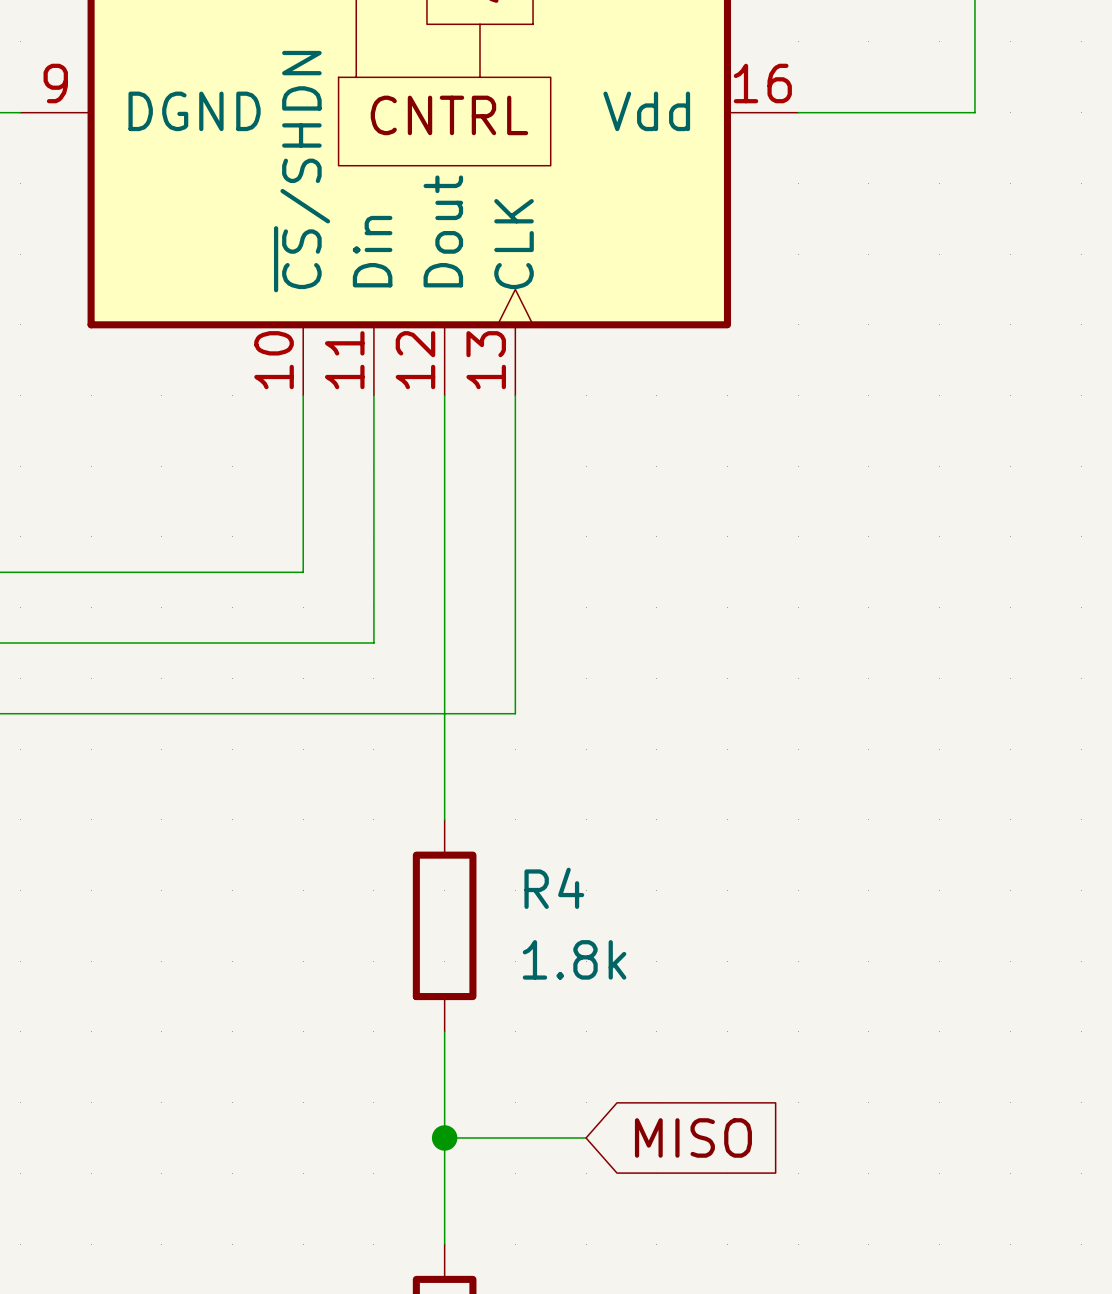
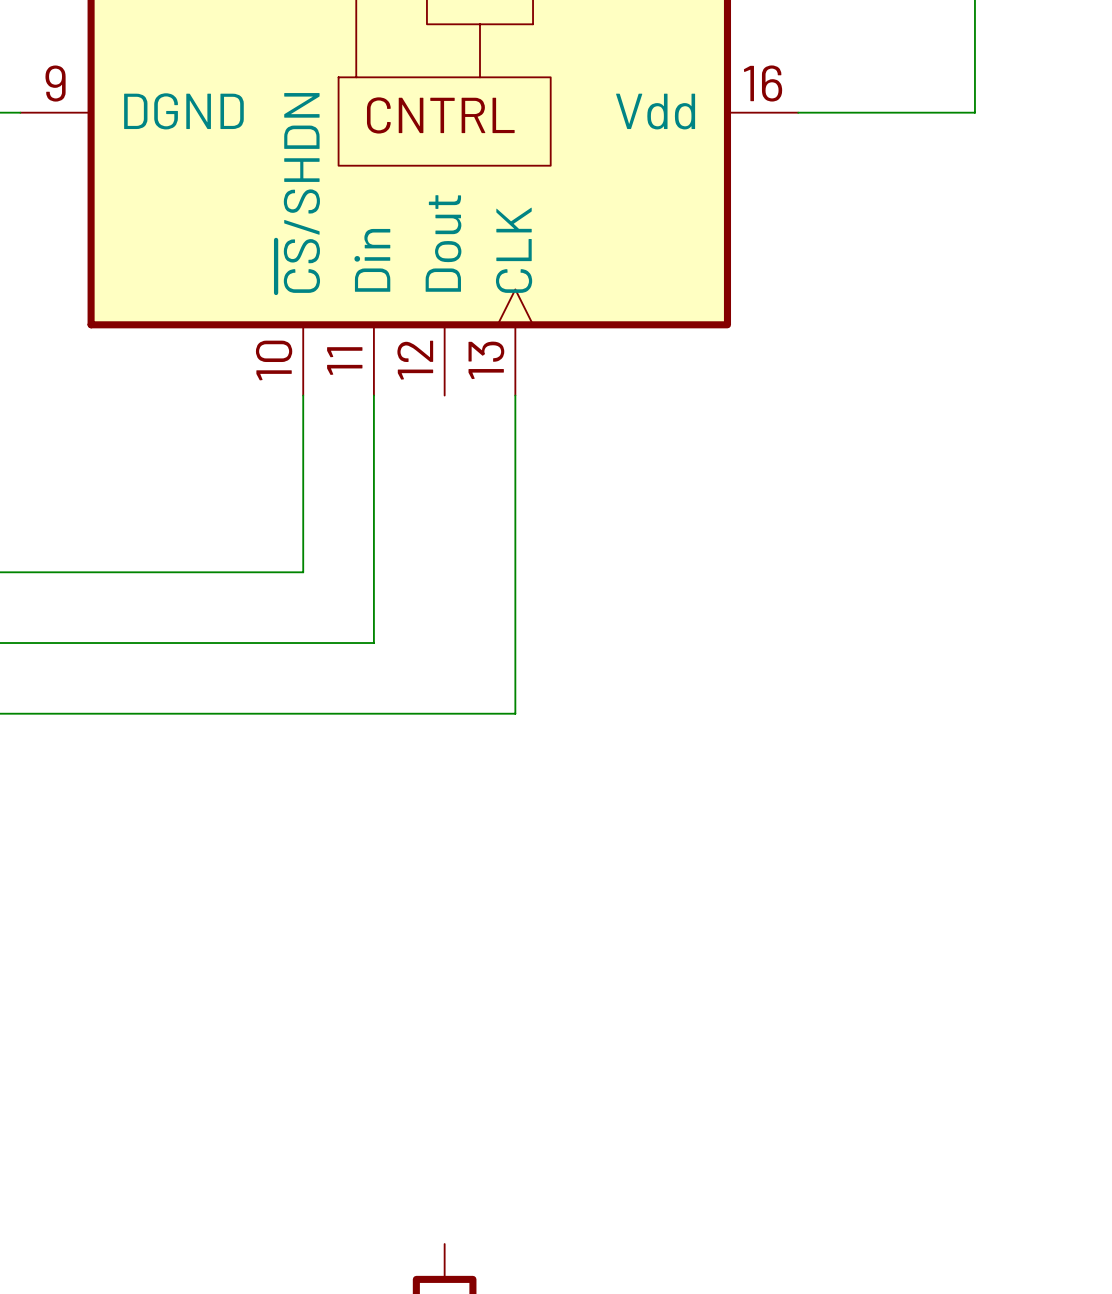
wire: (444, 395) (444, 819) -> none
R4: 1.8k (444, 925) -> none
wire: (444, 1031) (444, 1244) -> none
wire: (444, 1137) (586, 1137) -> none
junction: (444, 1137) -> none
global label: MISO (693, 1137) -> none

